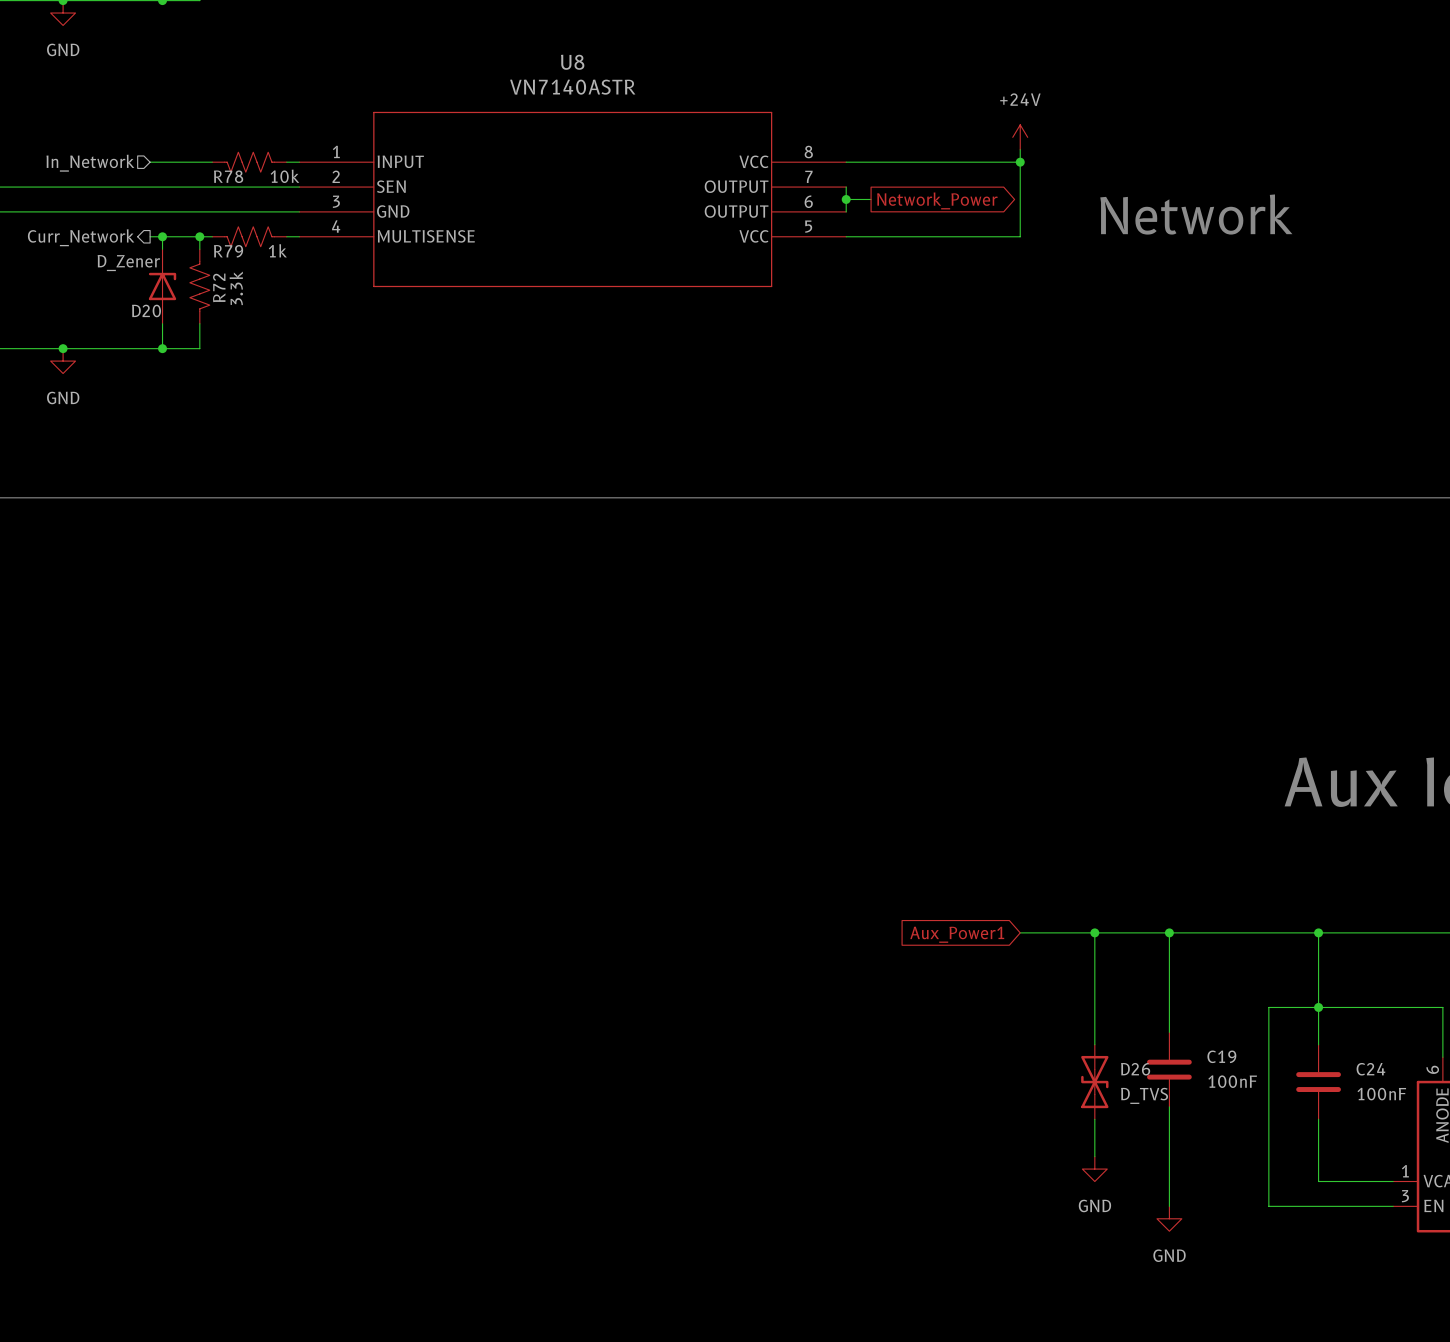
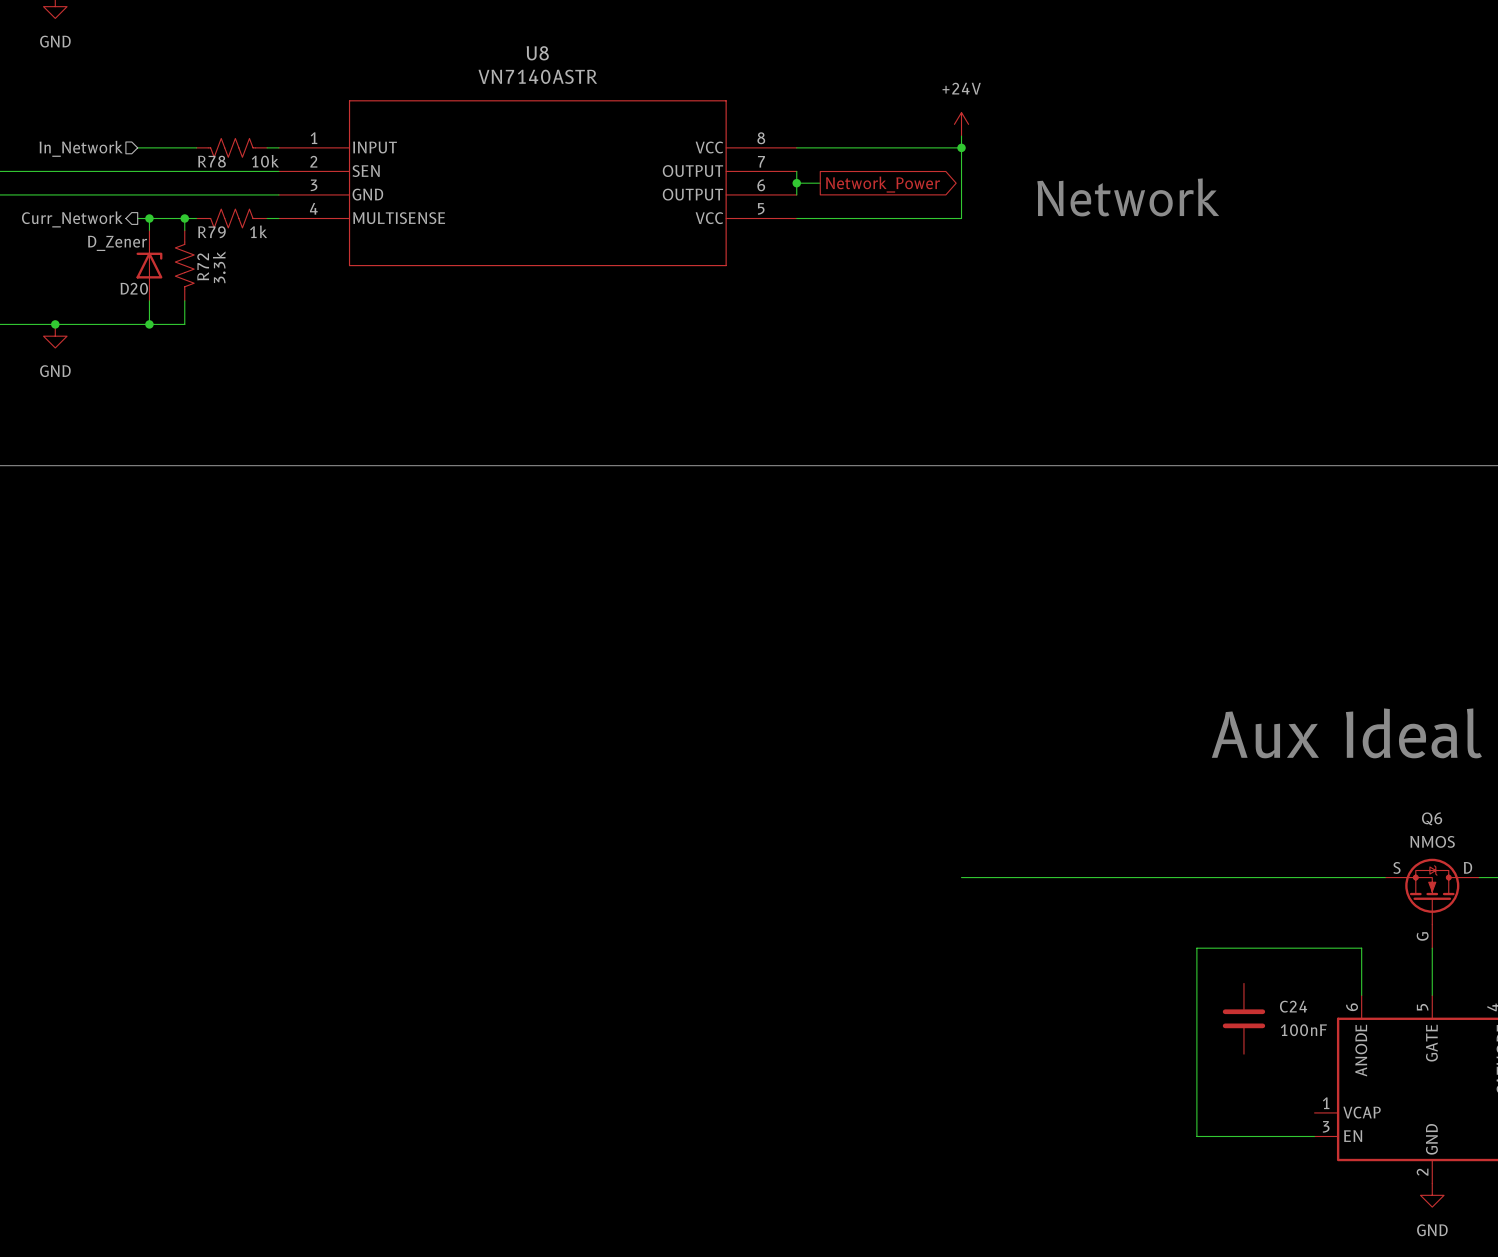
wire: (1094, 932) (1094, 1044) -> none
junction: (1094, 932) -> none
wire: (1169, 932) (1169, 1032) -> none
junction: (1169, 932) -> none
wire: (1318, 932) (1318, 1044) -> none
junction: (1318, 932) -> none
global label: Aux_Power1 (957, 934) -> none
junction: (1318, 1007) -> none
C19: 100nF (1169, 1069) -> none
D26: D_TVS (1094, 1082) -> none
wire: (1169, 1106) (1169, 1206) -> none
wire: (1094, 1119) (1094, 1156) -> none
wire: (1318, 1119) (1318, 1181) (1393, 1181) -> none
power symbol: GND (1094, 1169) -> none
power symbol: GND (1169, 1218) -> none

